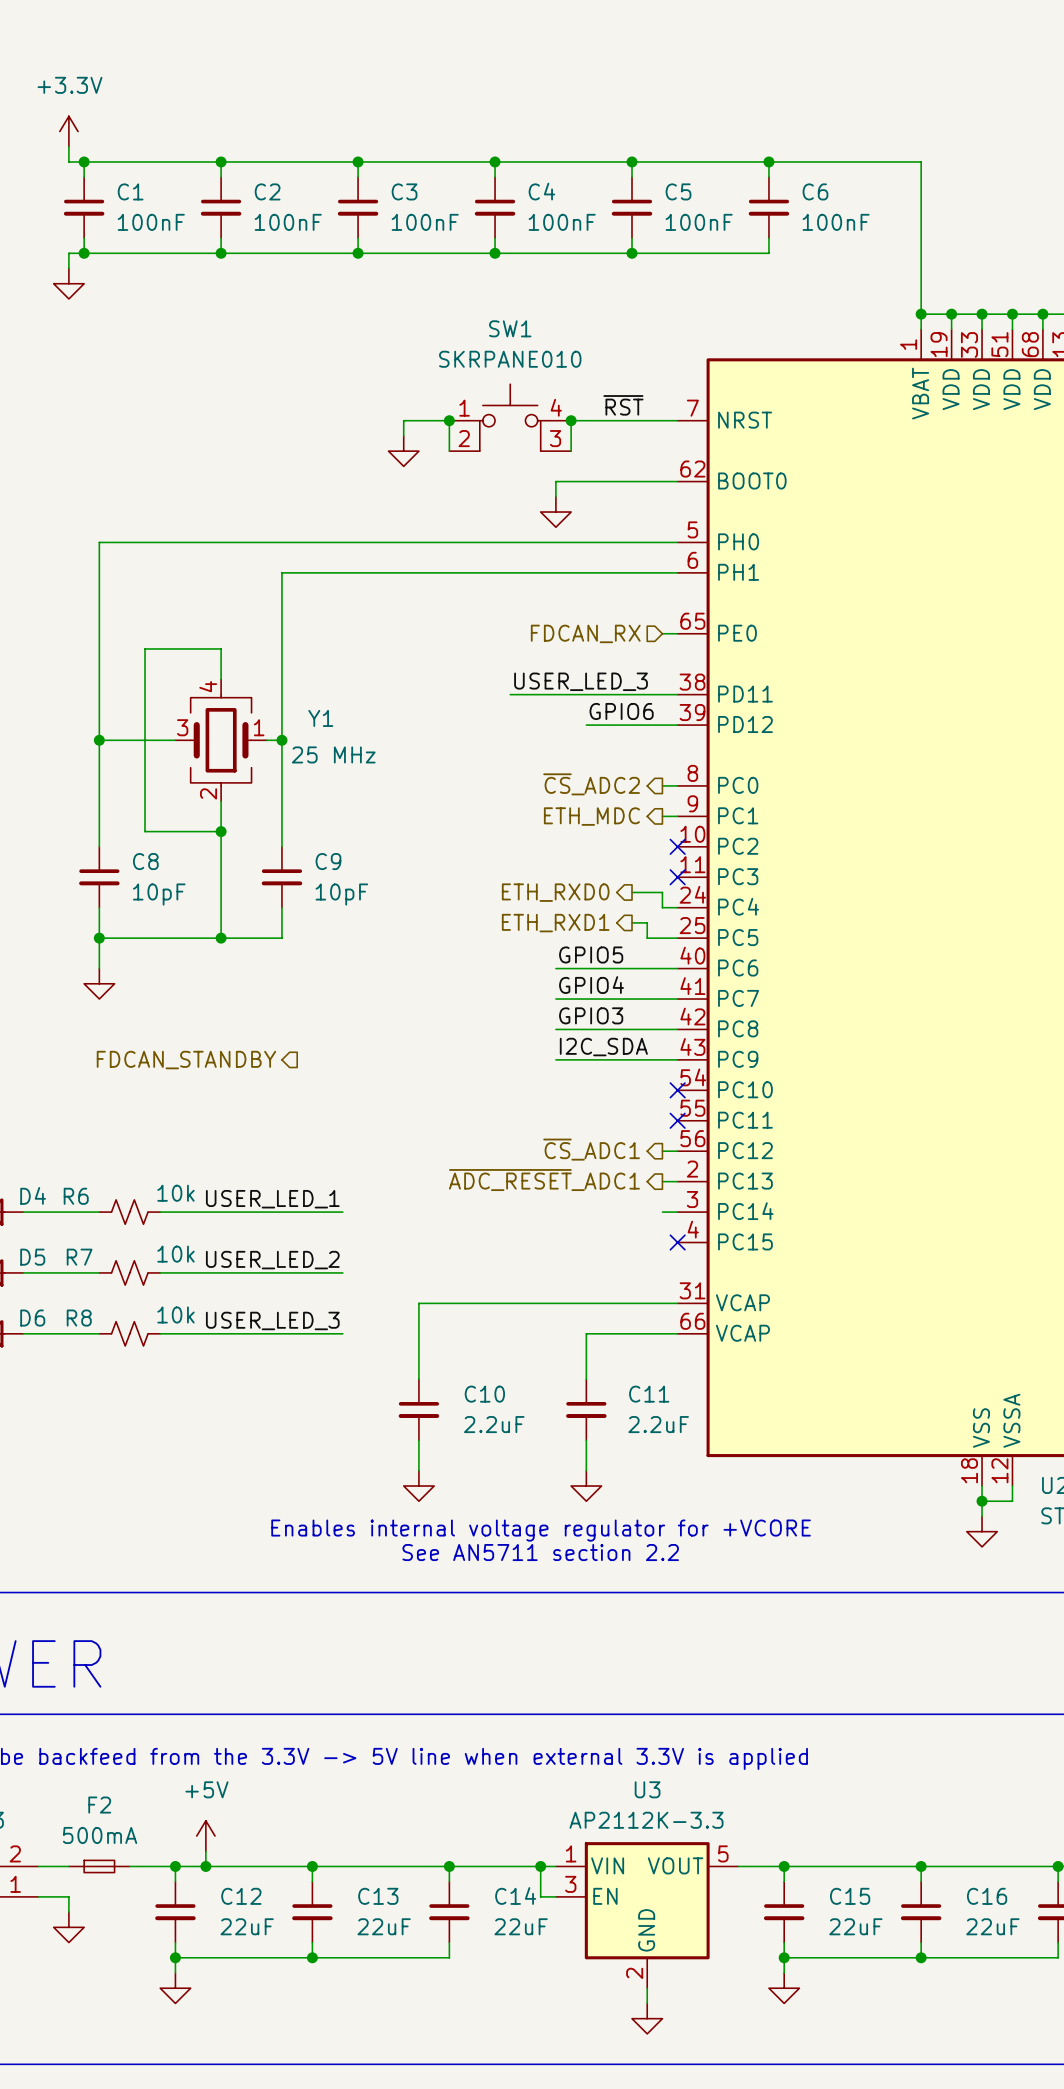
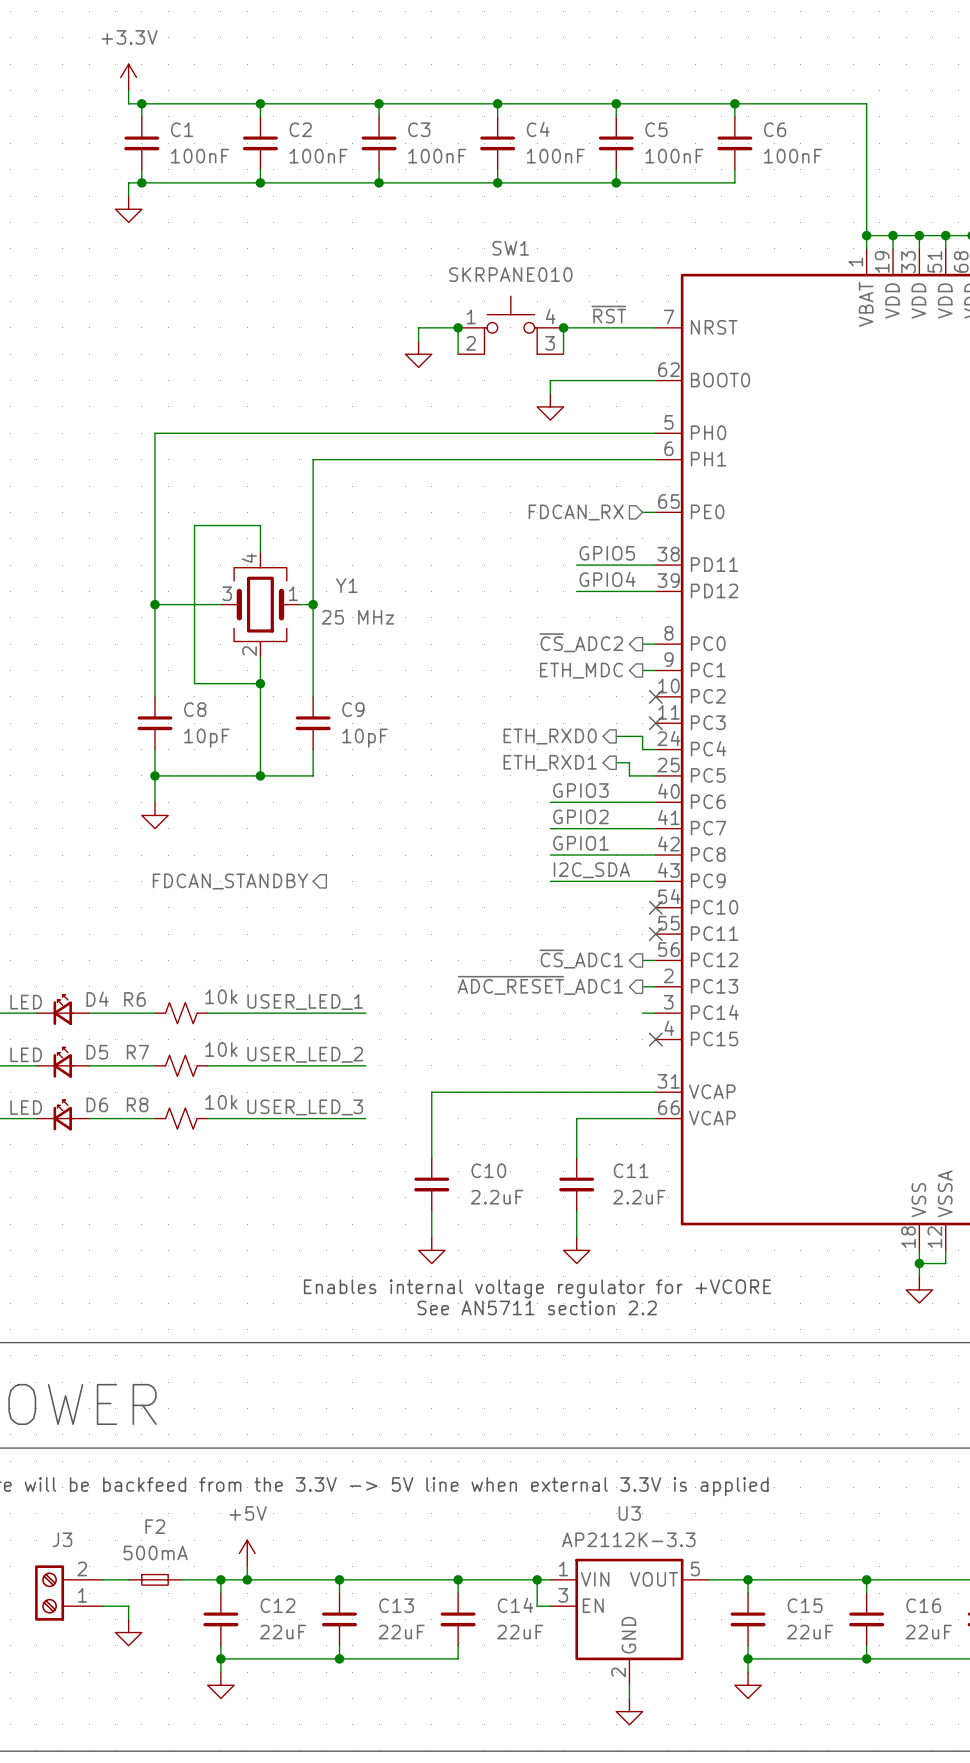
label: USER_LED_3 (581, 681) -> none
label: none -> GPIO5 (607, 553)
wire: (510, 694) (586, 694) -> none
label: GPIO6 (621, 711) -> GPIO4 (607, 579)
label: GPIO5 (591, 954) -> GPIO3 (580, 790)
label: GPIO4 (591, 985) -> GPIO2 (580, 816)
label: GPIO3 (591, 1015) -> GPIO1 (580, 843)

